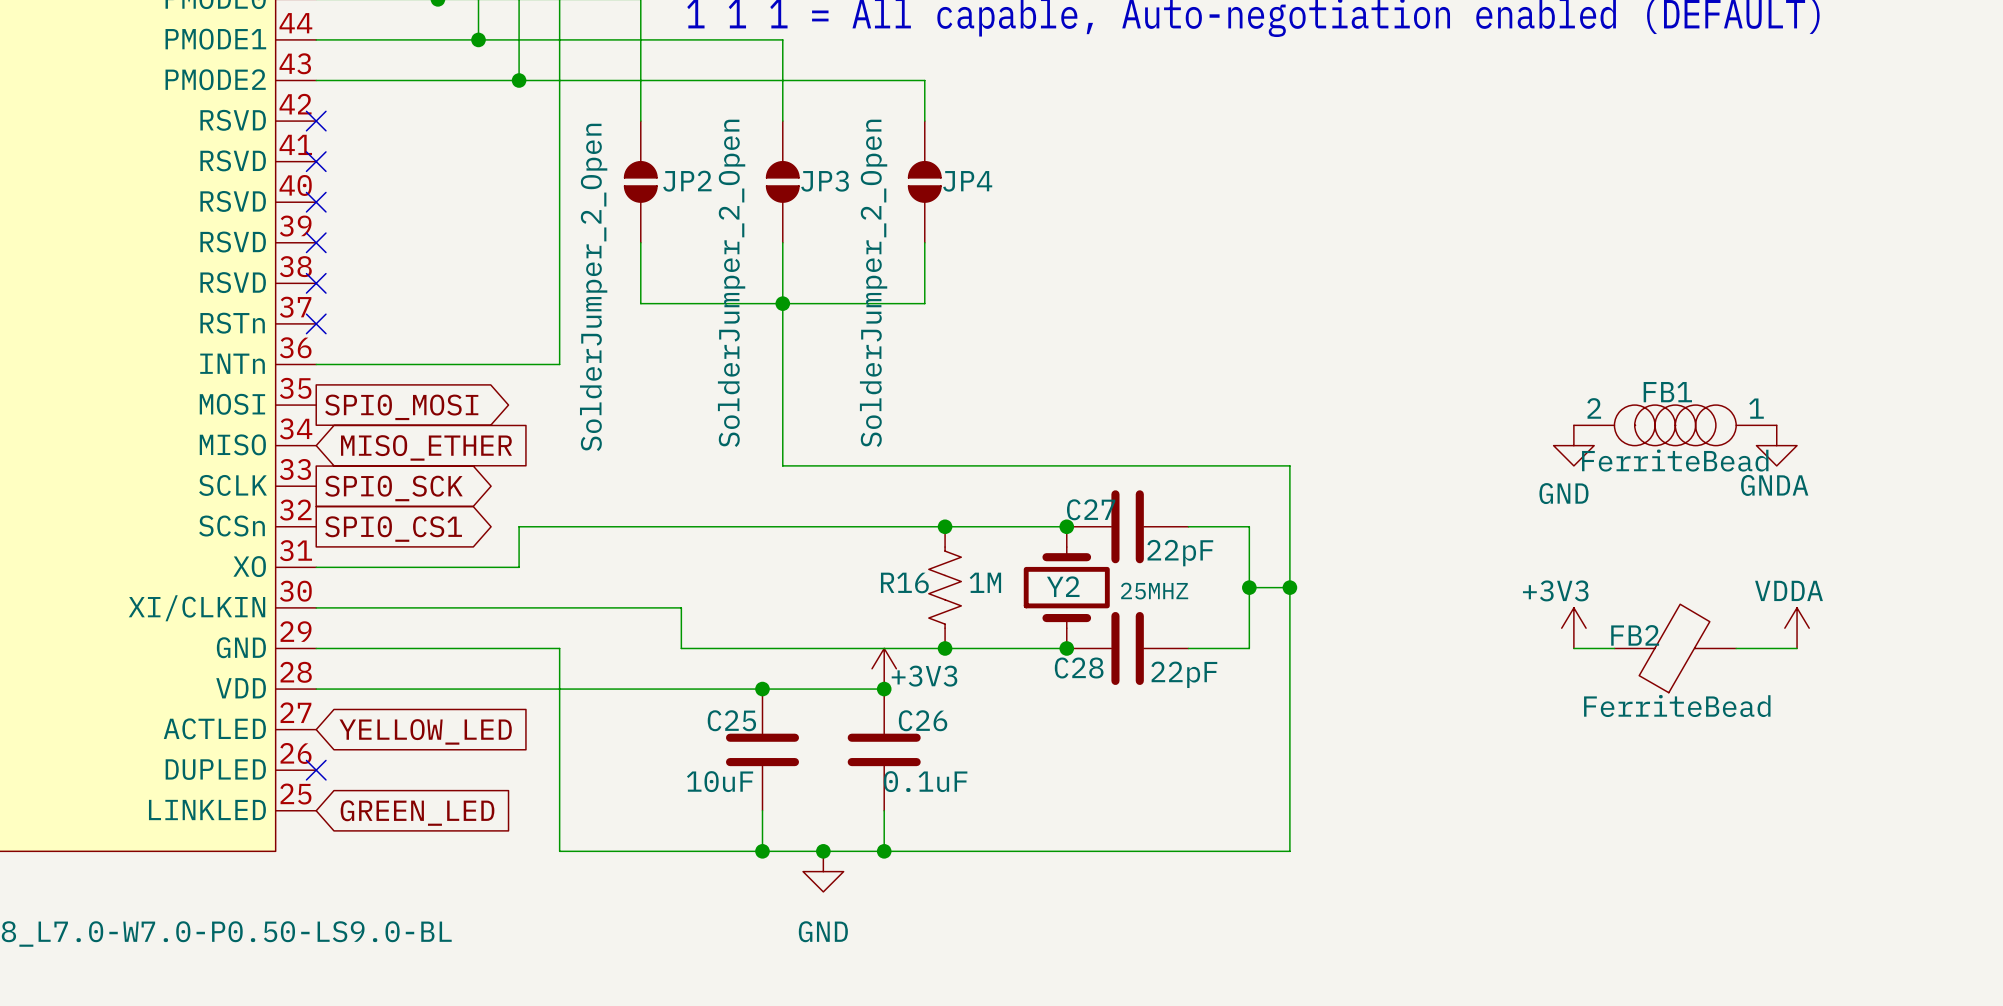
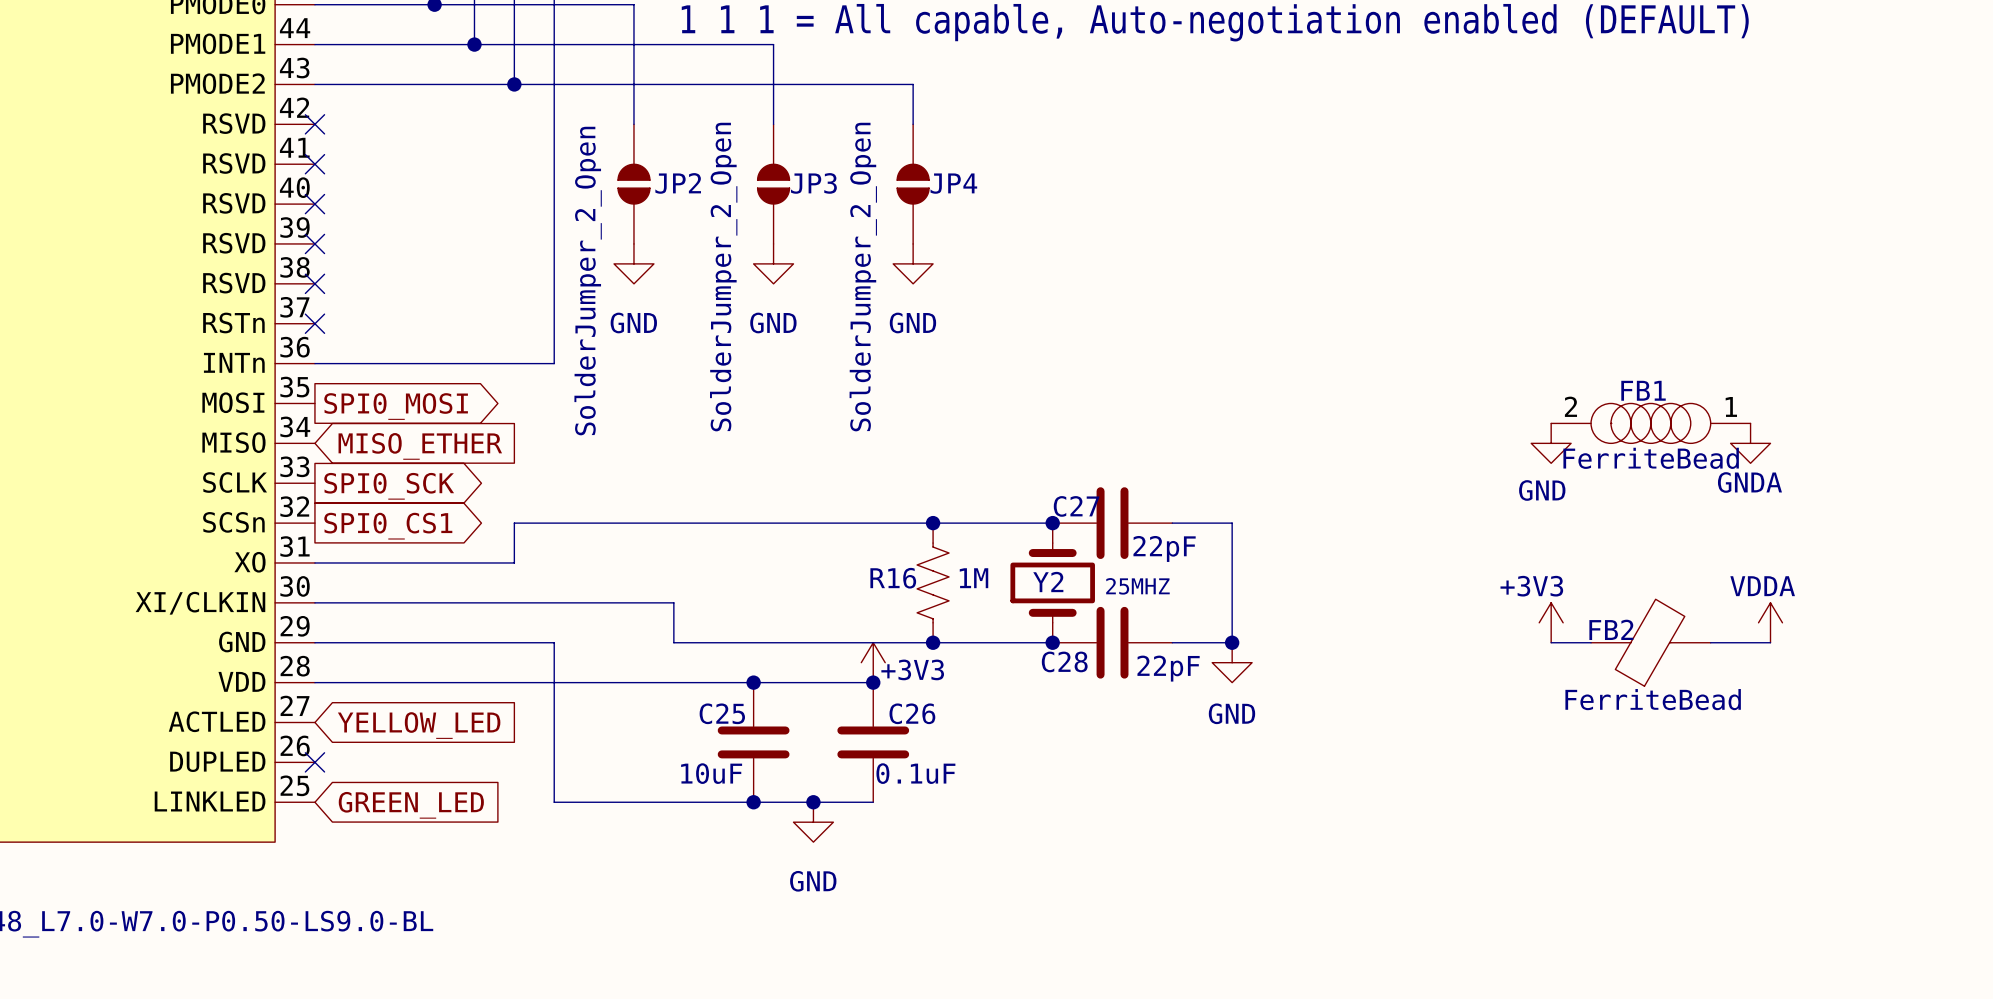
wire: (640, 242) (640, 303) (924, 303) (924, 242) -> none
wire: (782, 242) (782, 465) (1289, 465) (1289, 851) (559, 851) (559, 810) -> none
power symbol: none -> GND (633, 263)
power symbol: none -> GND (773, 263)
power symbol: none -> GND (913, 263)
junction: (782, 303) -> none
wire: (1249, 587) (1289, 587) -> none
junction: (1249, 587) -> none
junction: (1289, 587) -> none
junction: none -> (1232, 642)
power symbol: none -> GND (1232, 662)
wire: (762, 810) (762, 851) -> none
junction: none -> (753, 802)
junction: none -> (813, 802)
wire: (884, 810) (884, 851) -> (873, 802) (554, 802)
junction: (762, 851) -> none
junction: (823, 851) -> none
junction: (884, 851) -> none
power symbol position: GND (823, 871) -> GND (813, 822)

